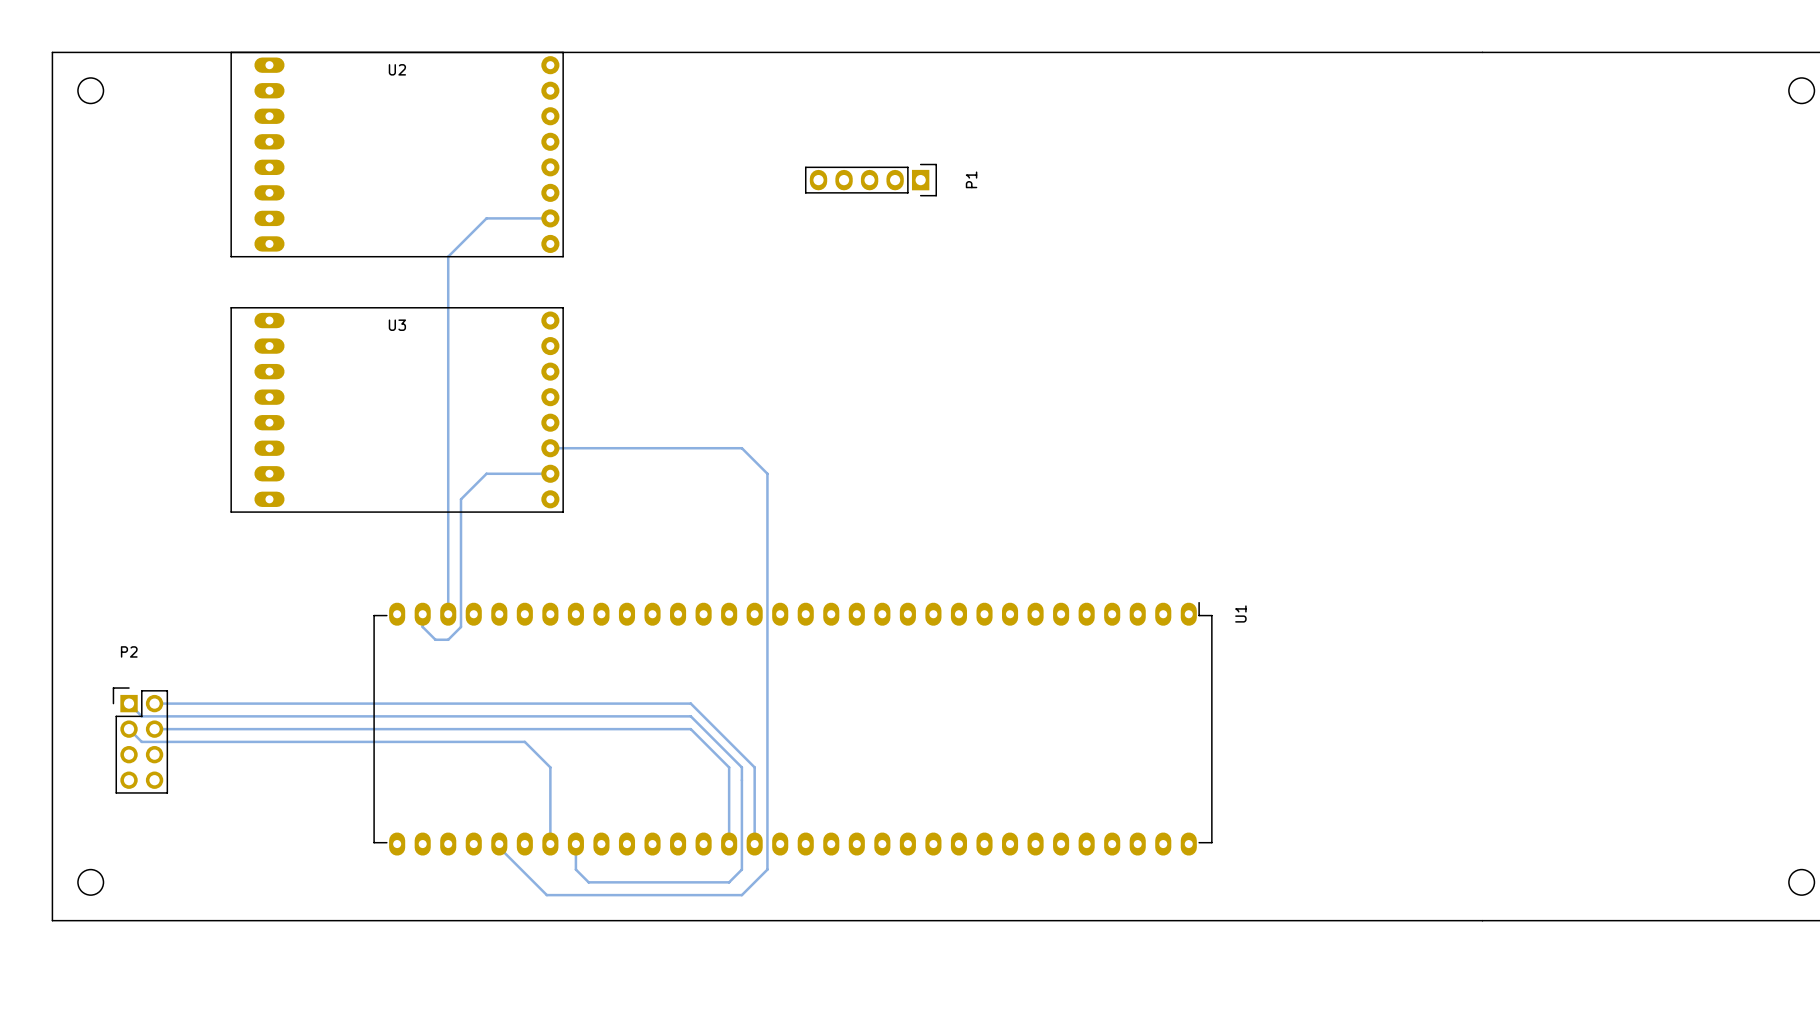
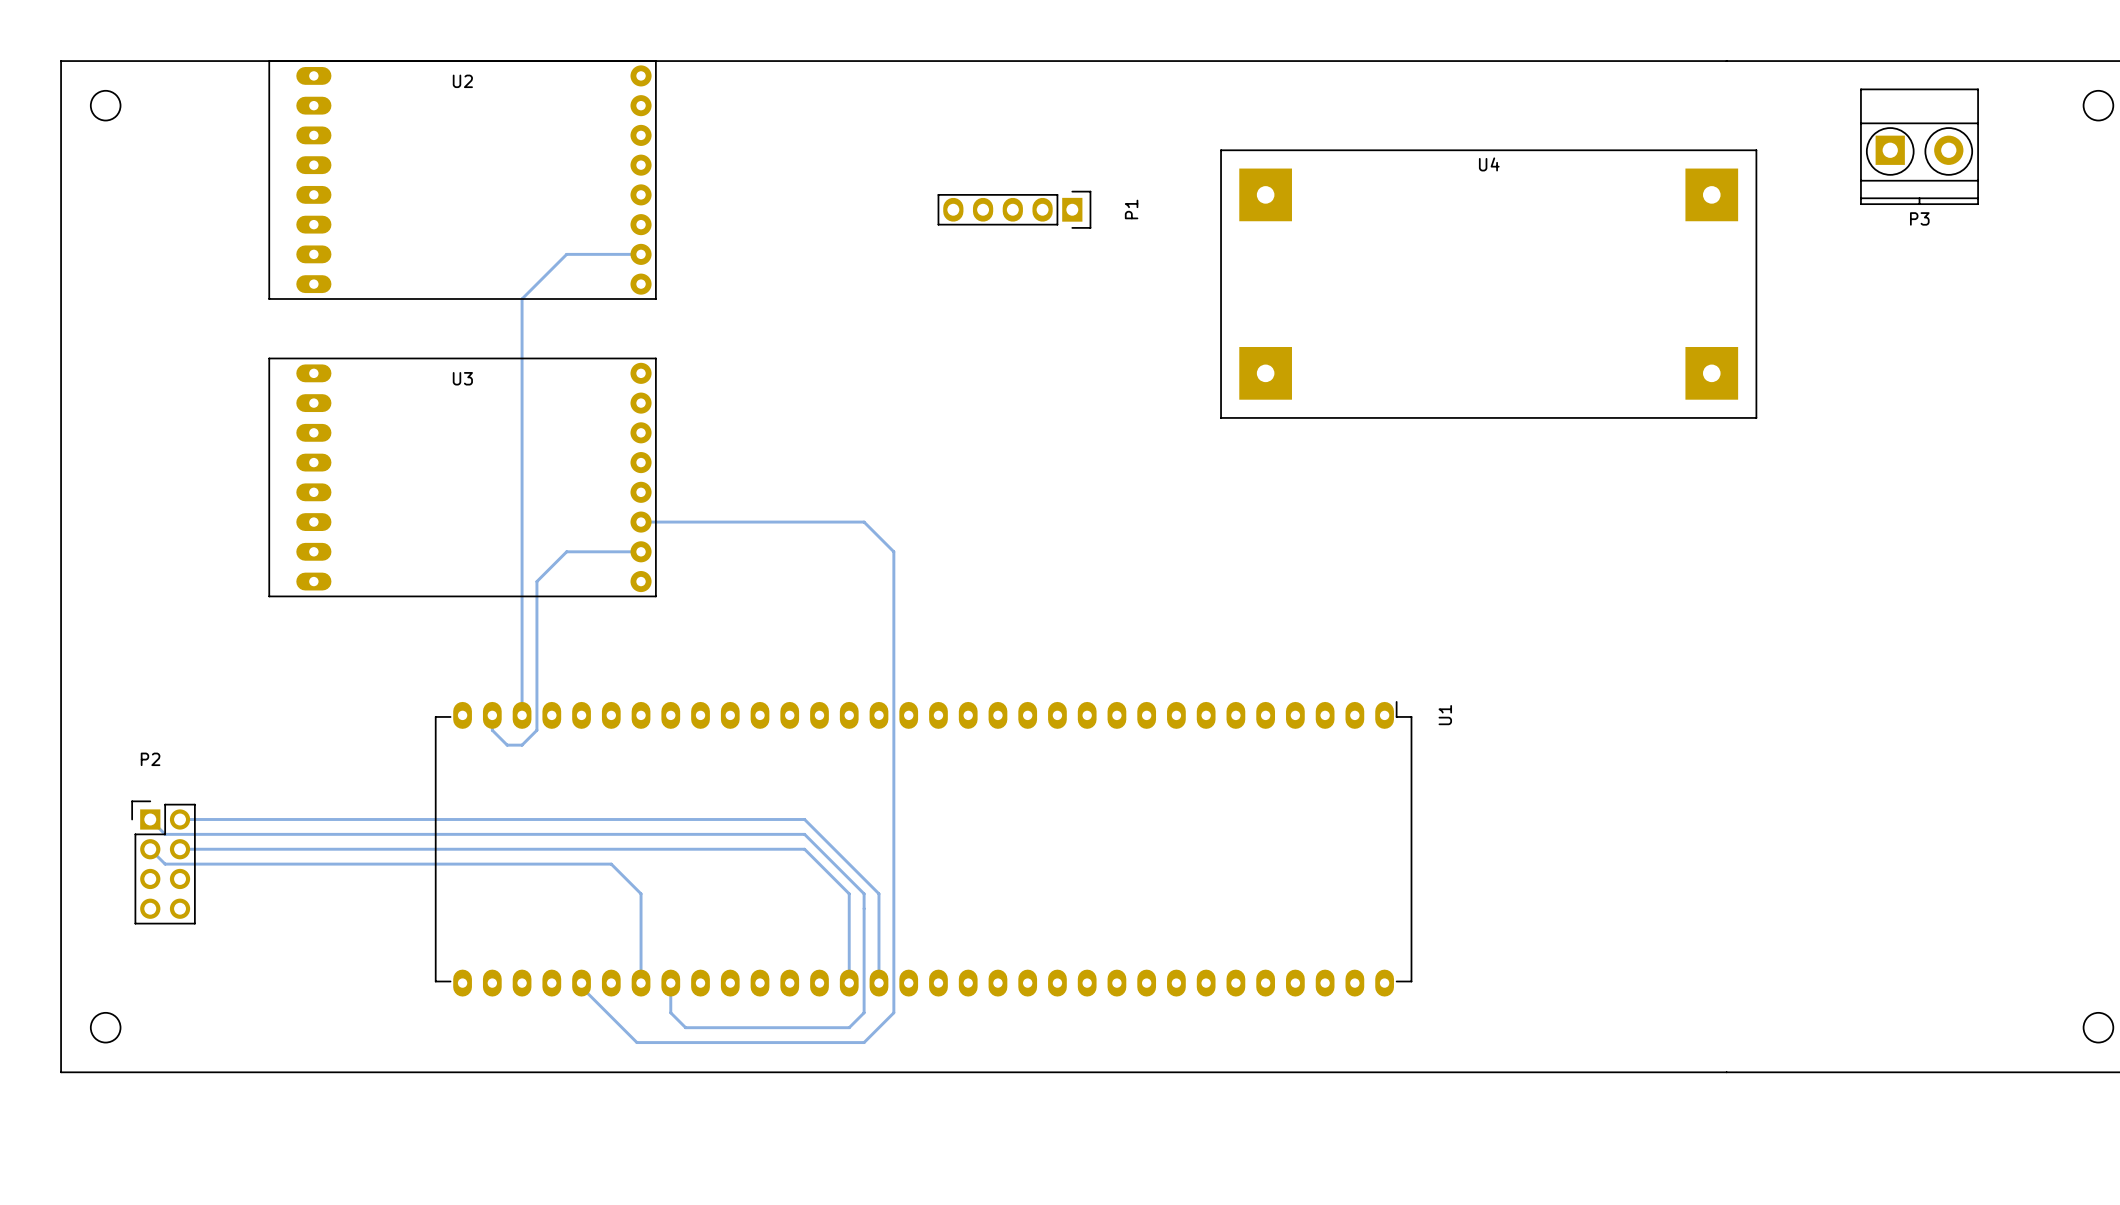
P3: none -> (1919, 146)
U4: none -> (1488, 284)

